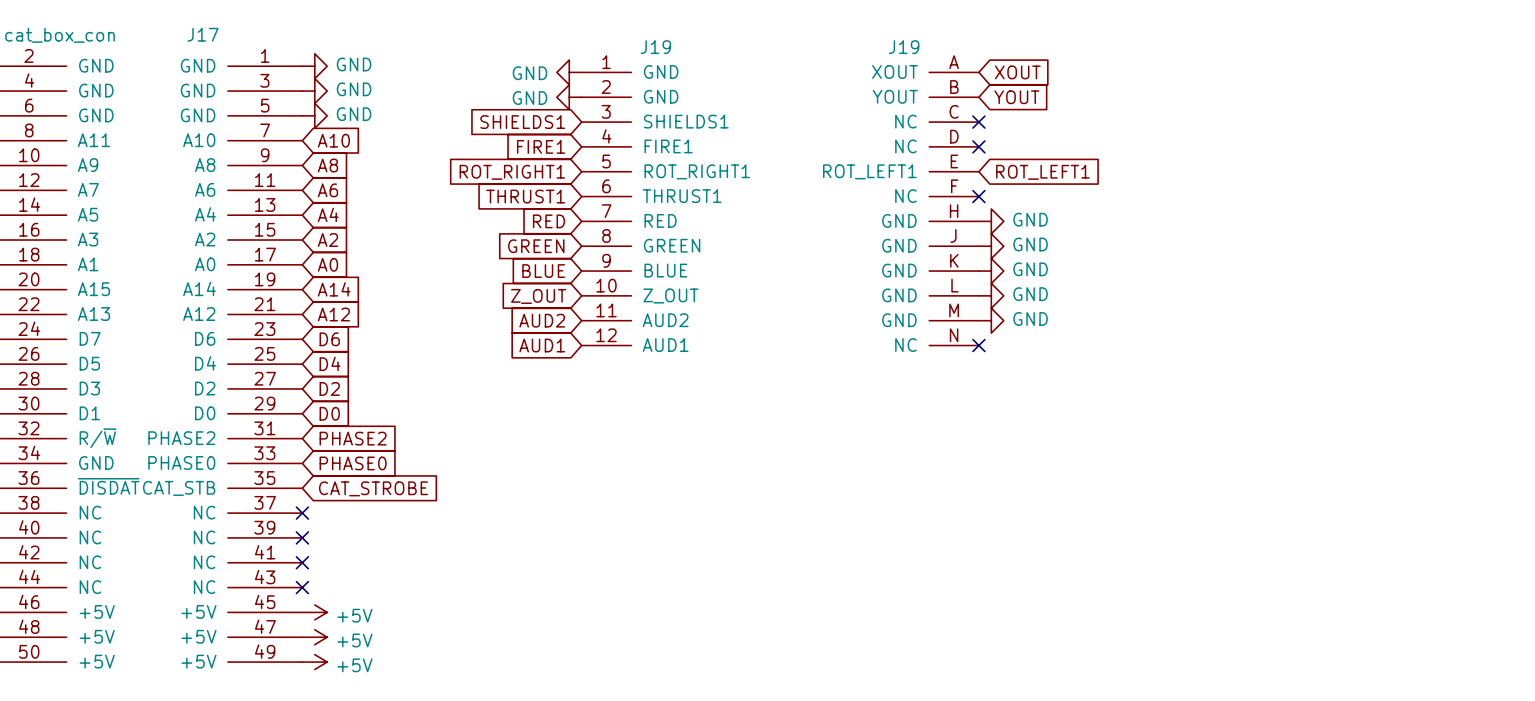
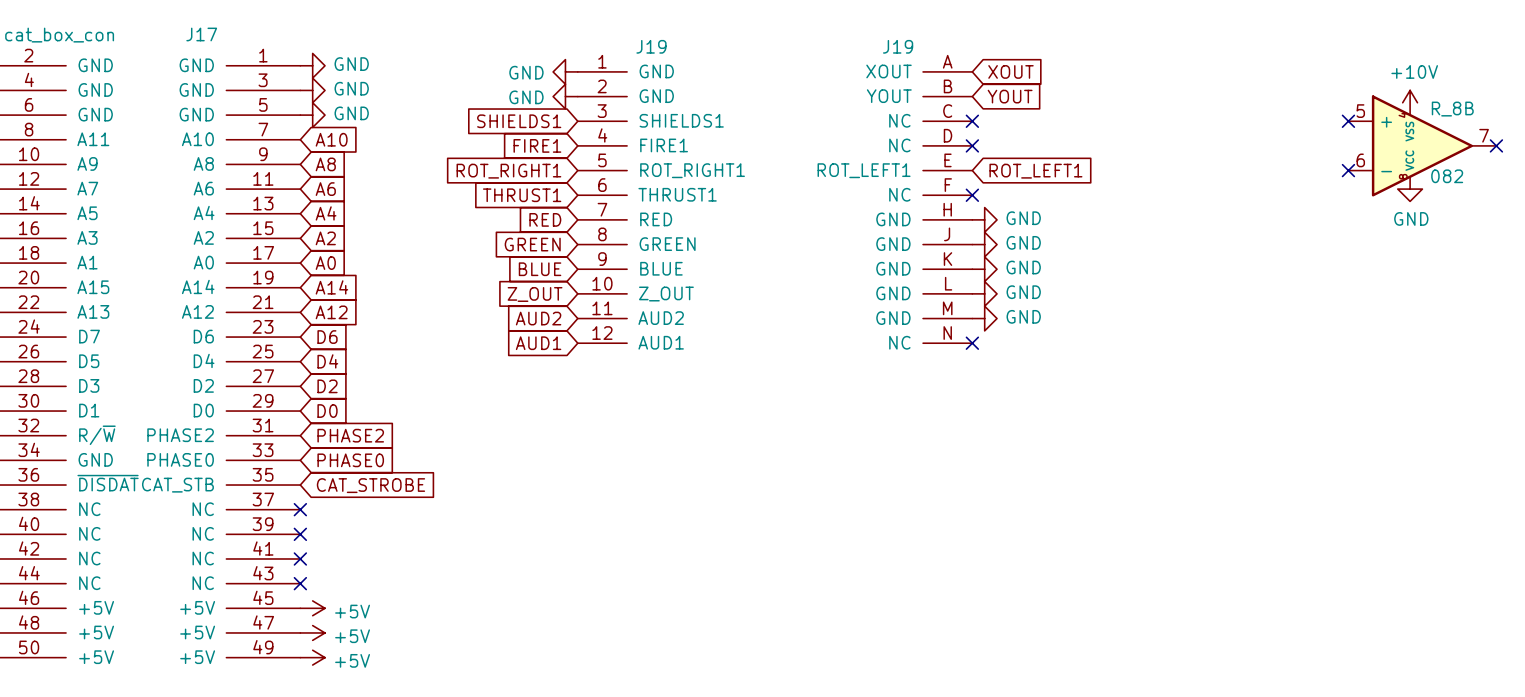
power symbol: none -> +10V (1410, 102)
no-connect mark: none -> (1348, 121)
R_8B: none -> 082 (1422, 145)
no-connect mark: none -> (1496, 145)
no-connect mark: none -> (1348, 170)
power symbol: none -> GND (1410, 189)

